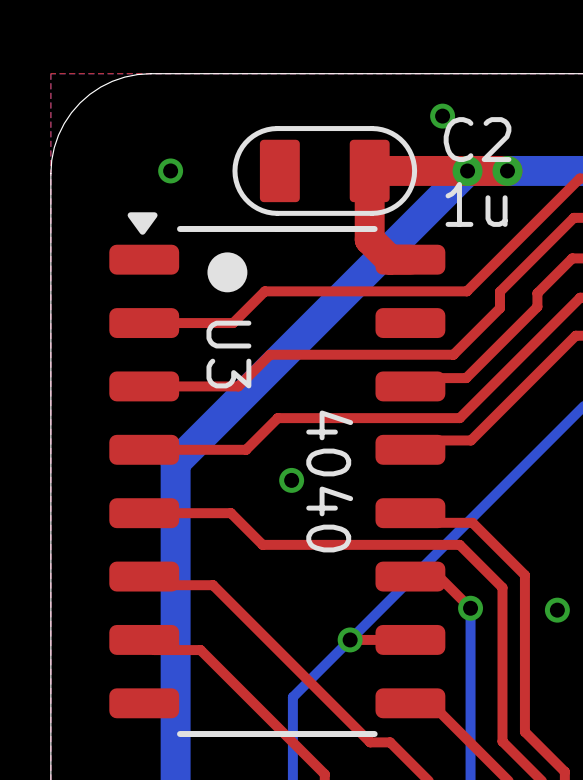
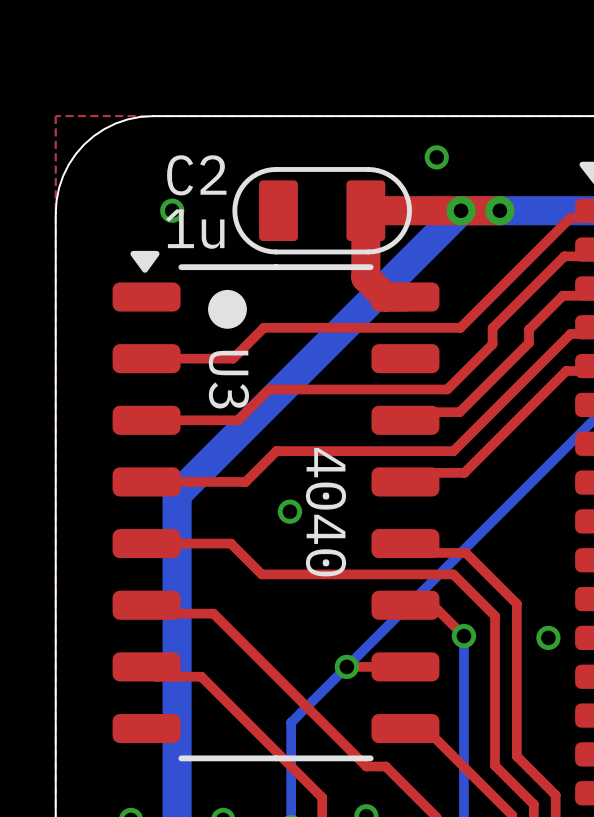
C2 name position: C2 (477, 139) -> C2 (196, 175)
C2 value position: 1u (476, 204) -> 1u (195, 229)

